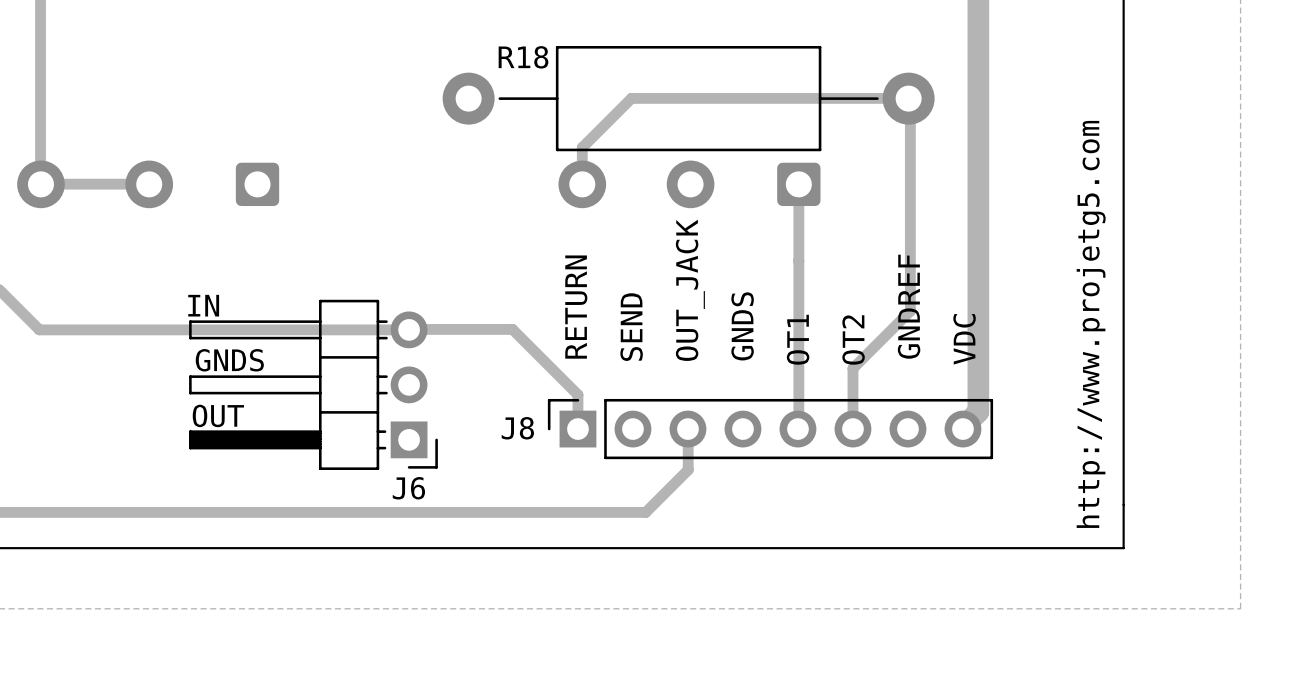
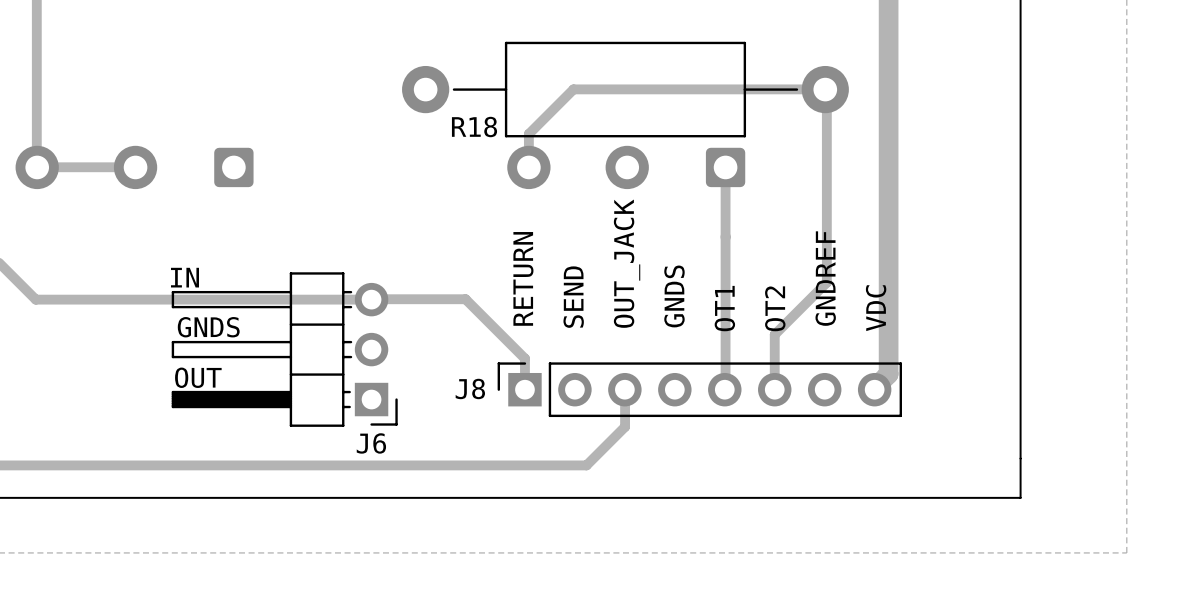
R18 name position: R18 (523, 57) -> R18 (474, 127)
text: http://www.projetg5.com (1091, 324) -> none

